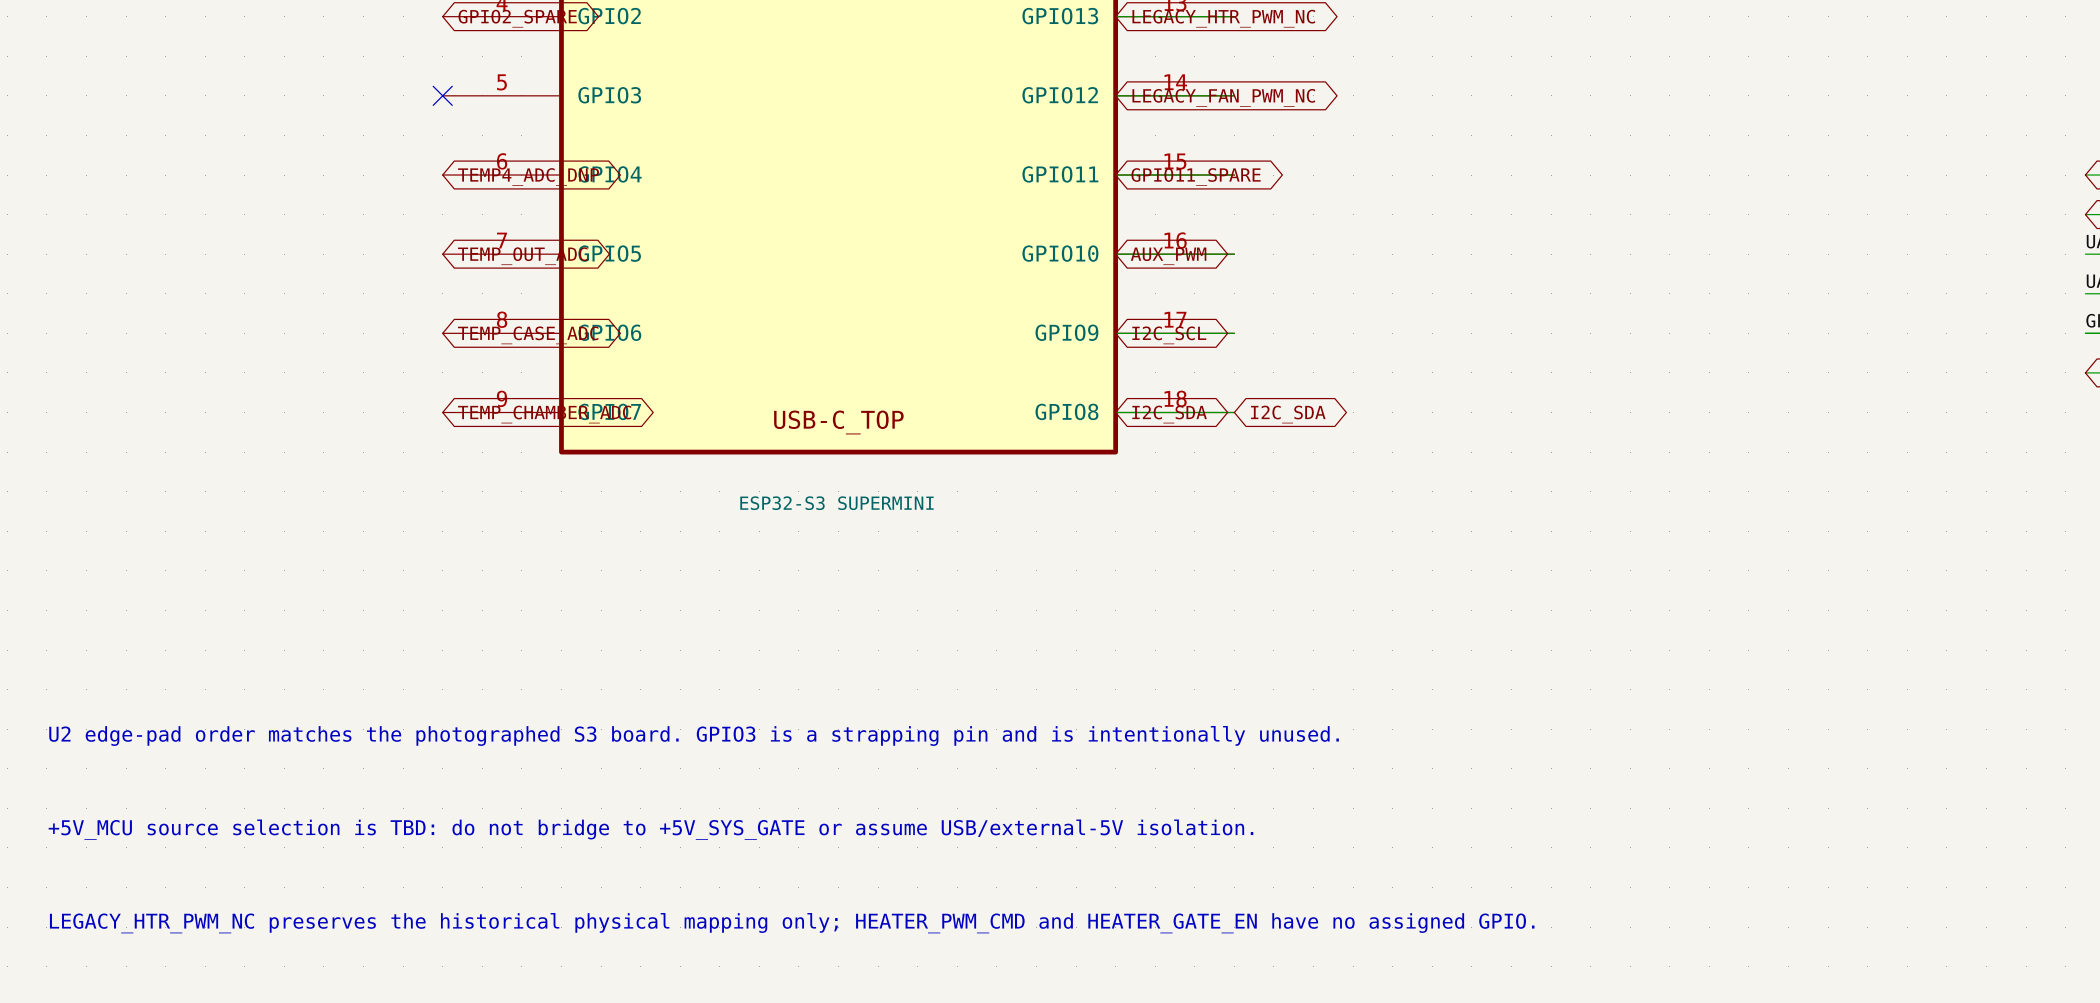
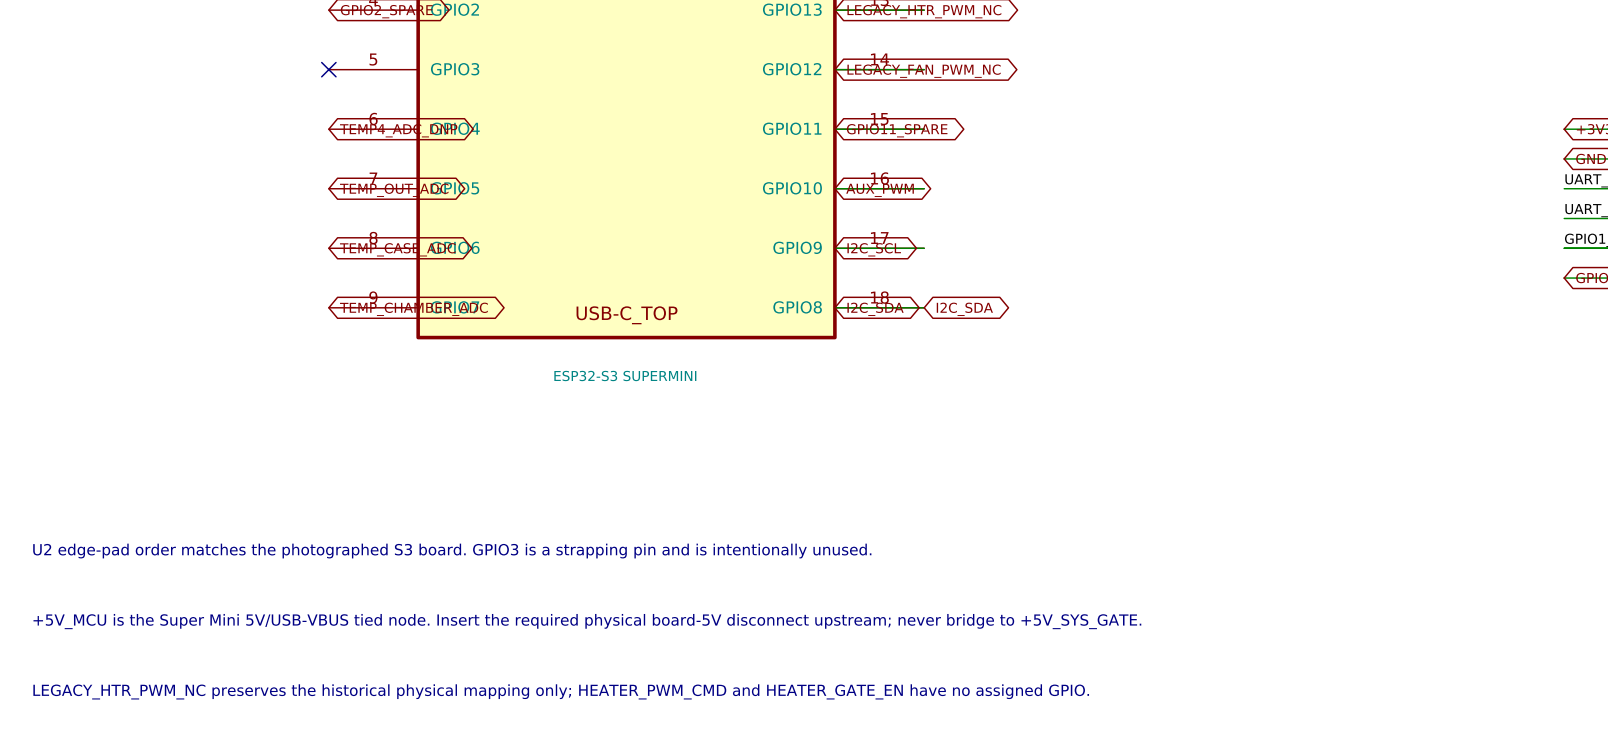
text: +5V_MCU source selection is TBD: do not bridge to +5V_SYS_GATE or assume USB/external-5V isolation. (650, 829) -> +5V_MCU is the Super Mini 5V/USB-VBUS tied node. Insert the required physical board-5V disconnect upstream; never bridge to +5V_SYS_GATE. (587, 621)

